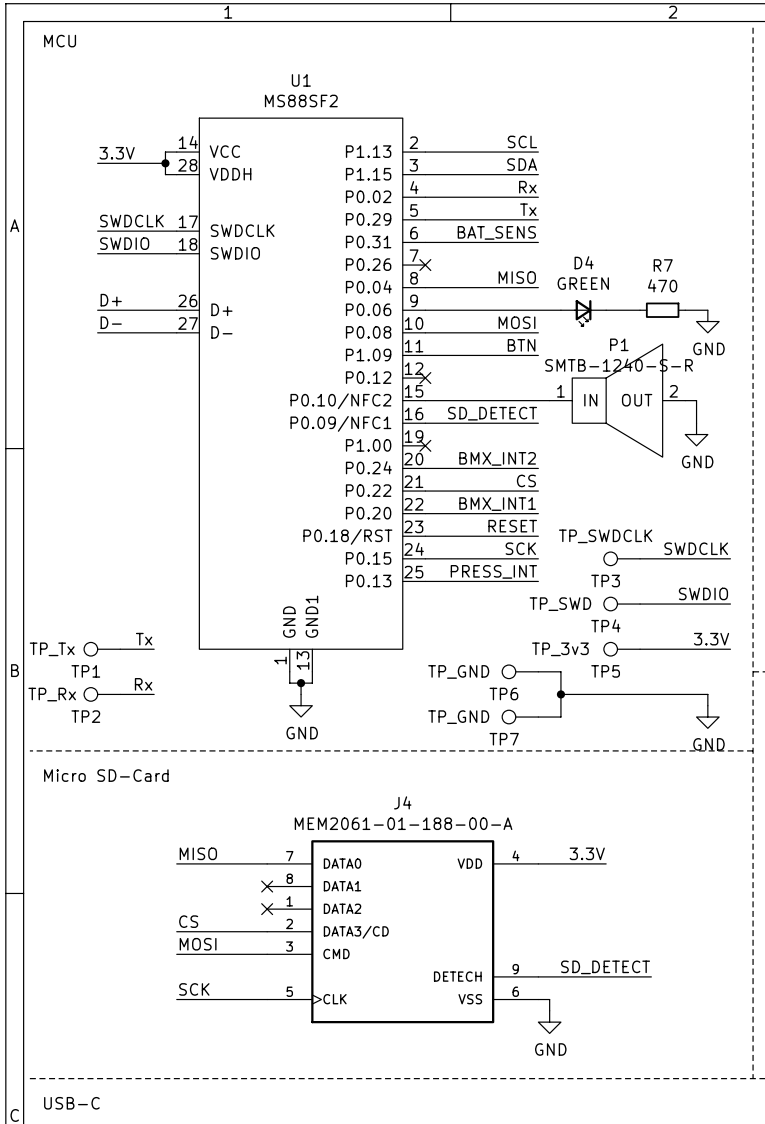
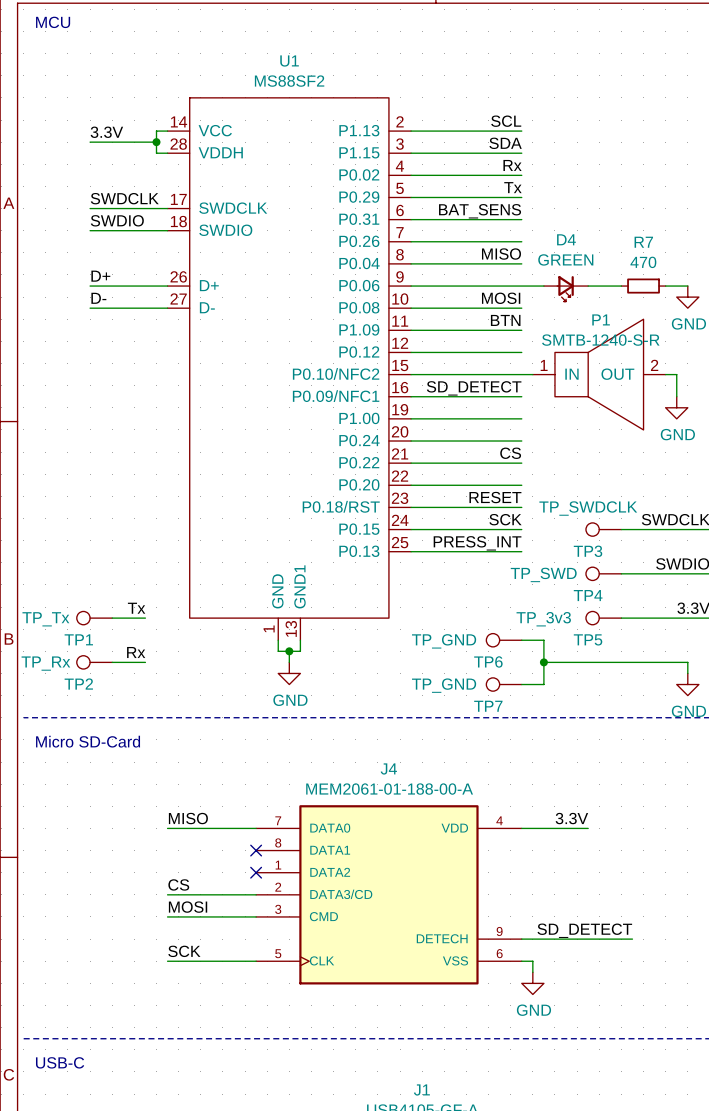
wire: none -> (411, 241) (521, 241)
no-connect mark: (425, 265) -> none
wire: none -> (411, 352) (521, 352)
no-connect mark: (425, 378) -> none
wire: none -> (411, 418) (521, 418)
no-connect mark: (425, 445) -> none
label: BMX_INT2 (497, 458) -> none
label: BMX_INT1 (497, 504) -> none

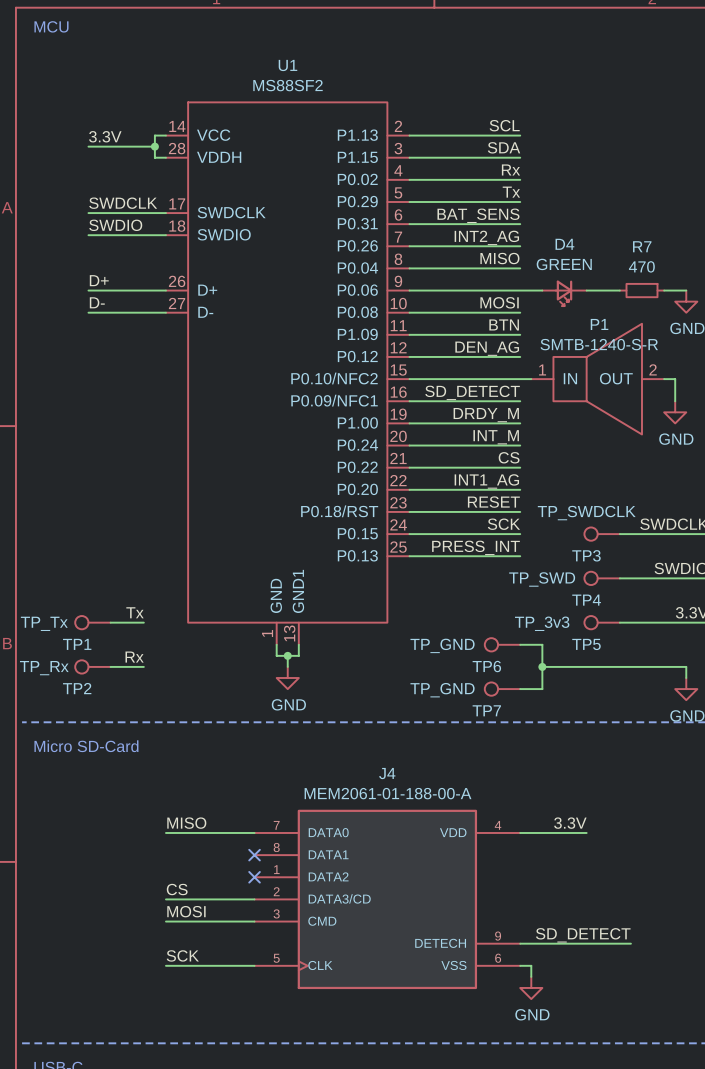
label: none -> INT2_AG (486, 237)
label: none -> DEN_AG (487, 348)
label: none -> DRDY_M (486, 415)
label: none -> INT_M (496, 437)
label: none -> INT1_AG (486, 481)

